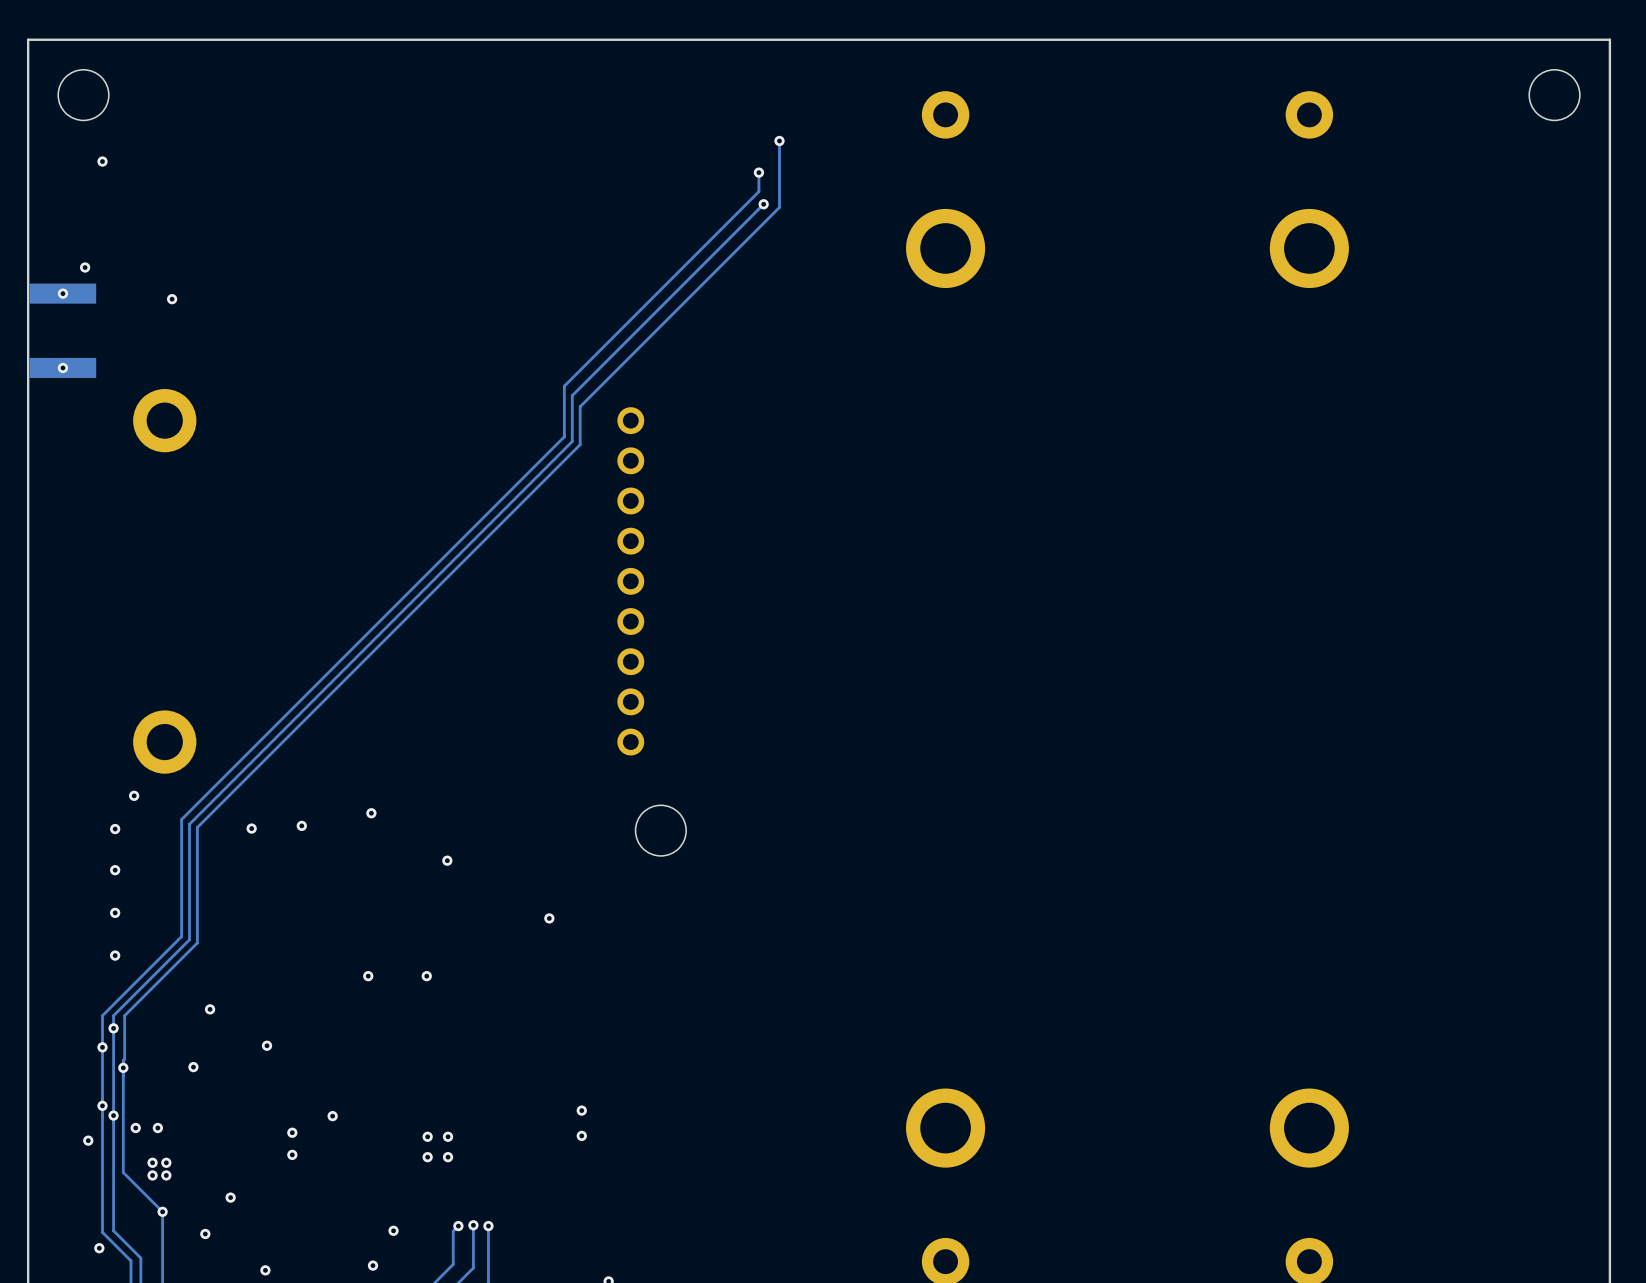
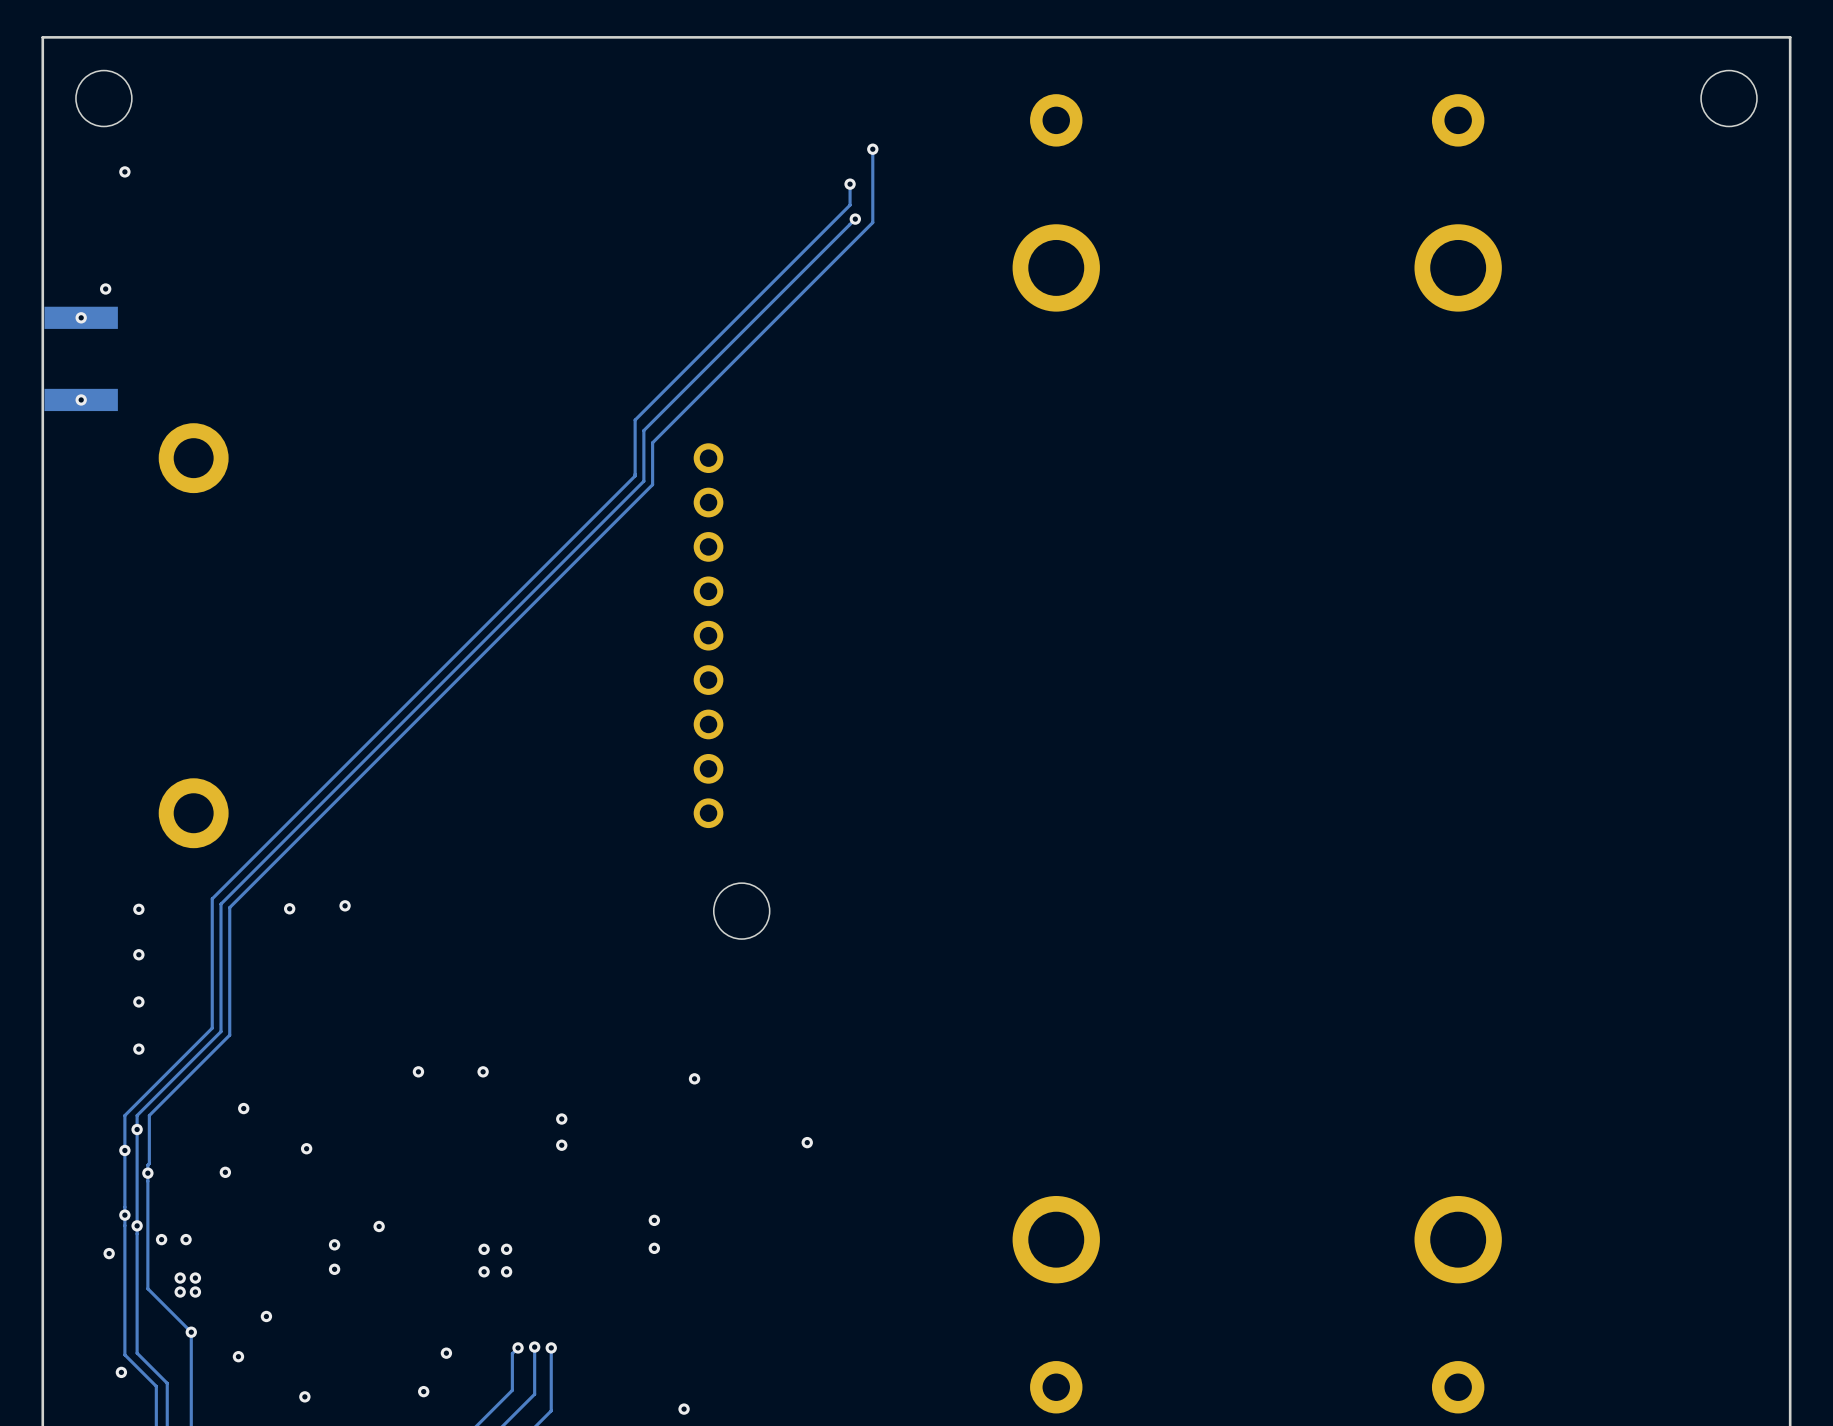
via: (172, 299) -> none
via: (134, 795) -> none
via: (371, 813) -> none
via: (447, 860) -> none
via: (549, 918) -> none
via: none -> (694, 1078)
via: none -> (561, 1119)
via: none -> (807, 1142)
via: none -> (561, 1145)

